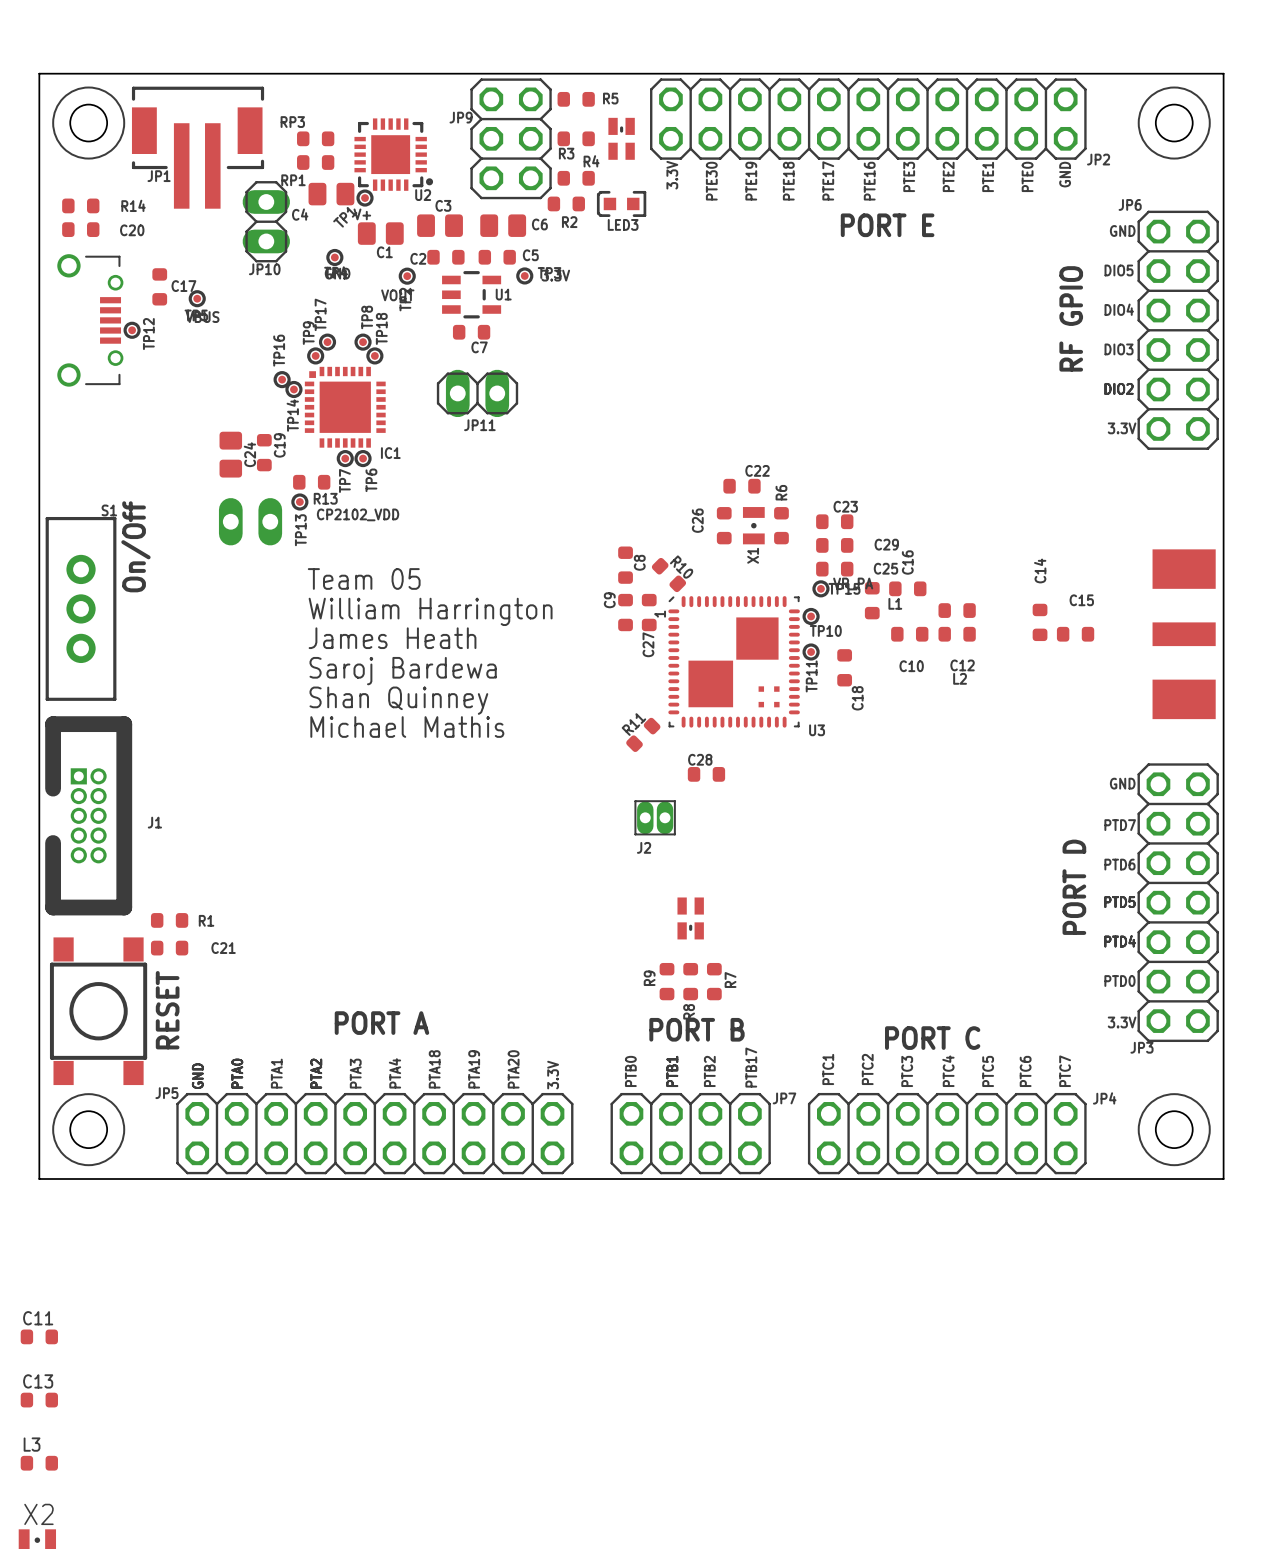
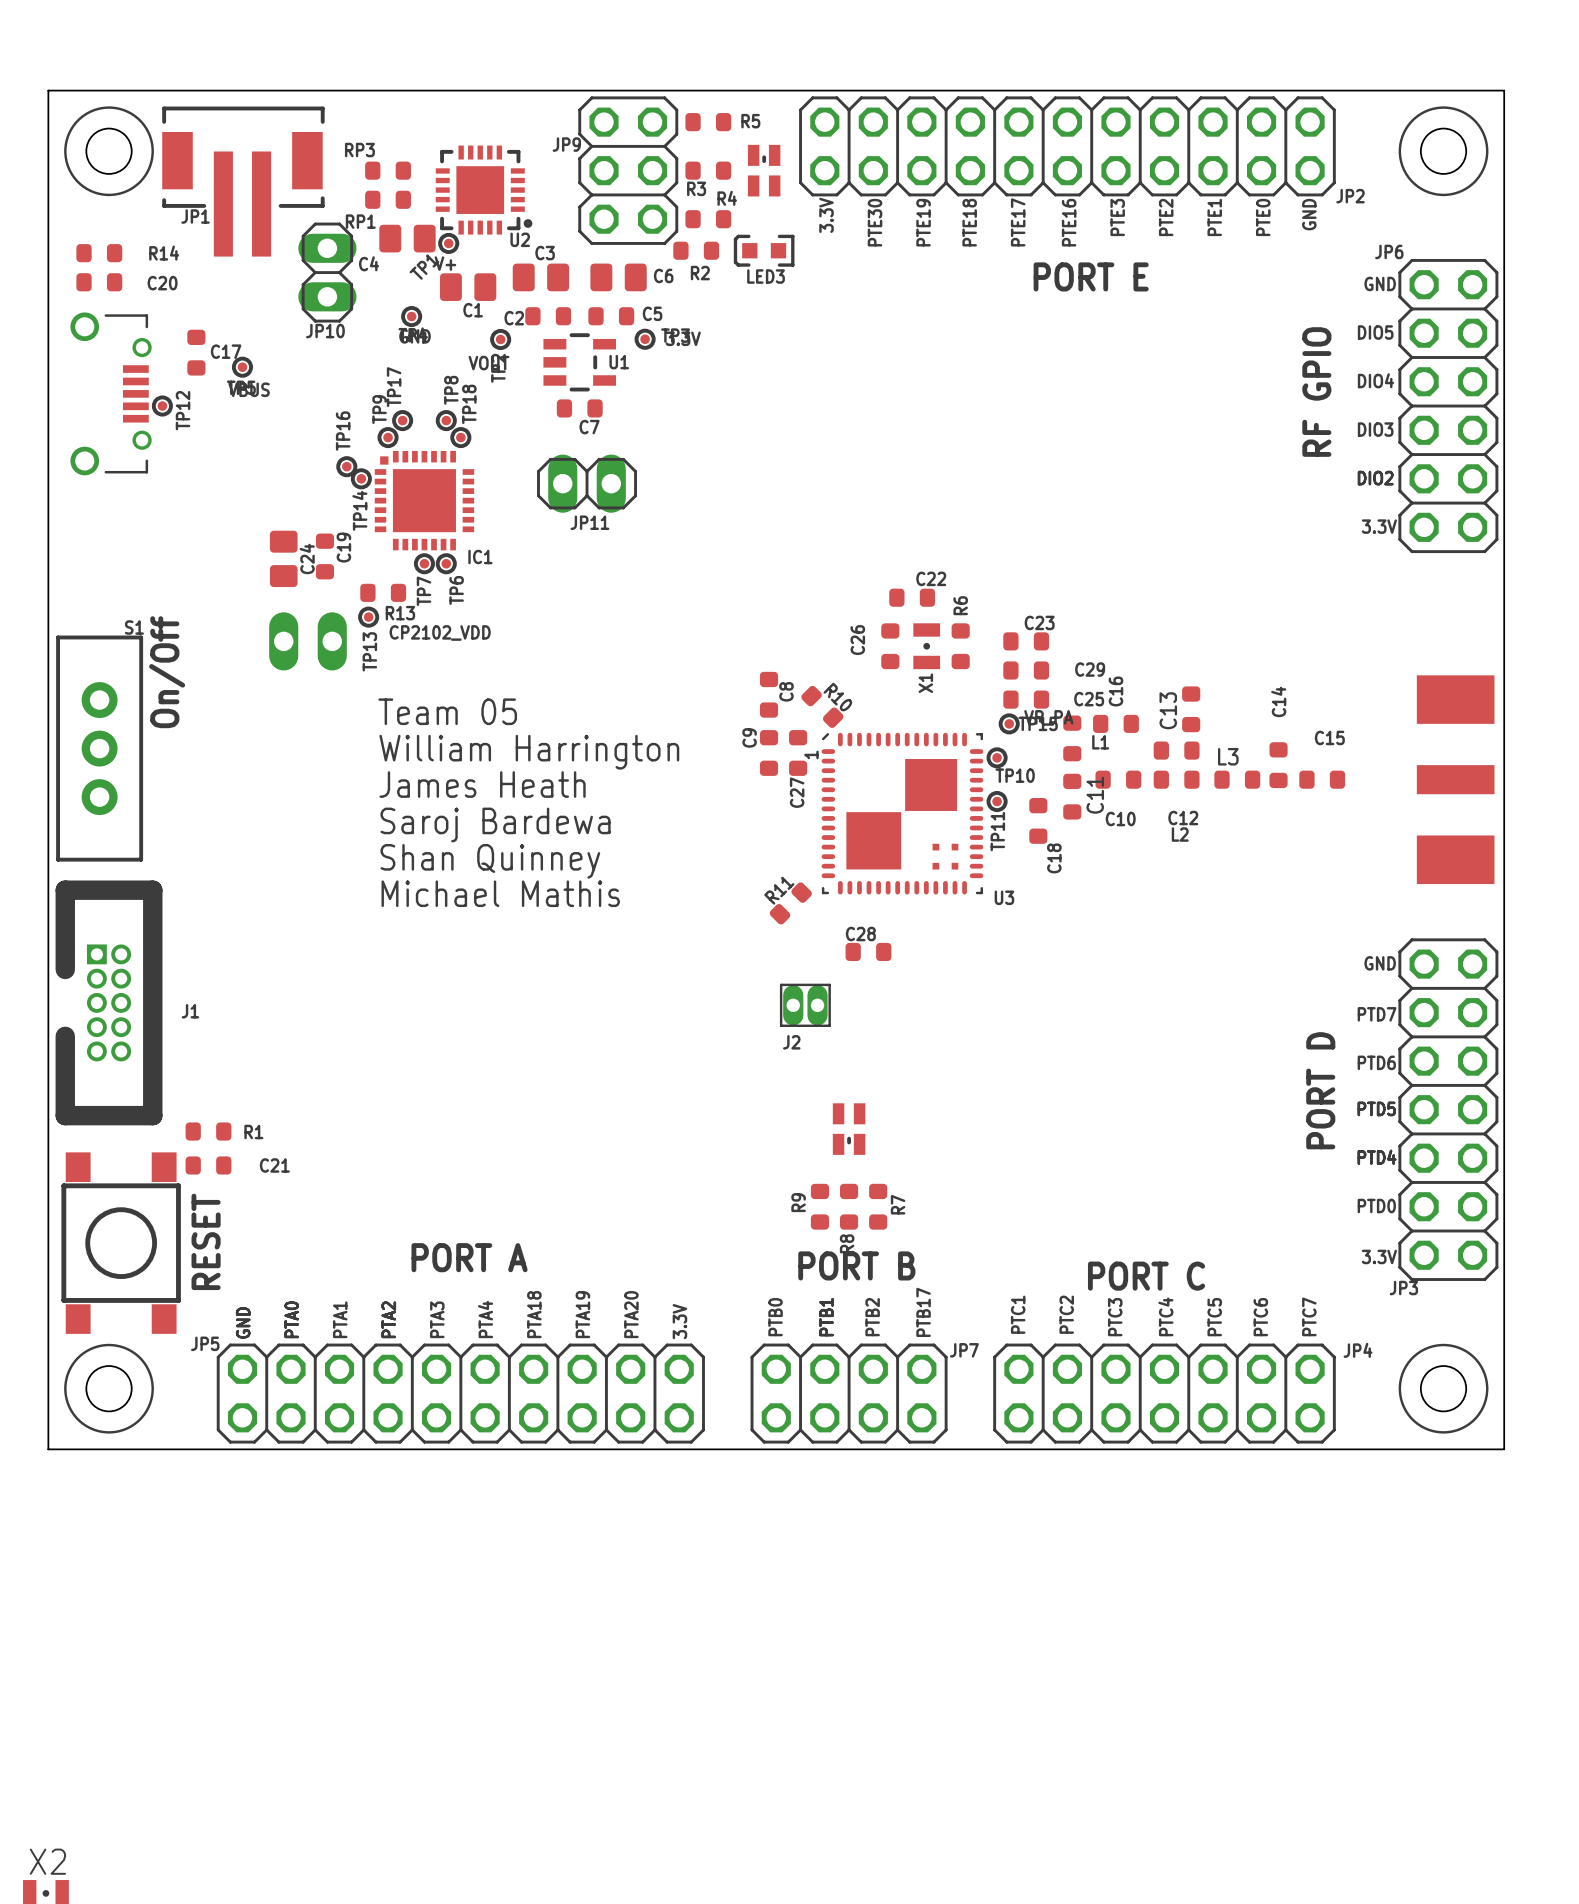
C11 rotation: 0° (39, 1336) -> 90° clockwise (1072, 796)
C11 position: (39, 1336) -> (1072, 796)
C13 rotation: 0° (39, 1400) -> 90° clockwise (1191, 709)
C13 position: (39, 1400) -> (1191, 709)
L3 position: (39, 1463) -> (1237, 779)

